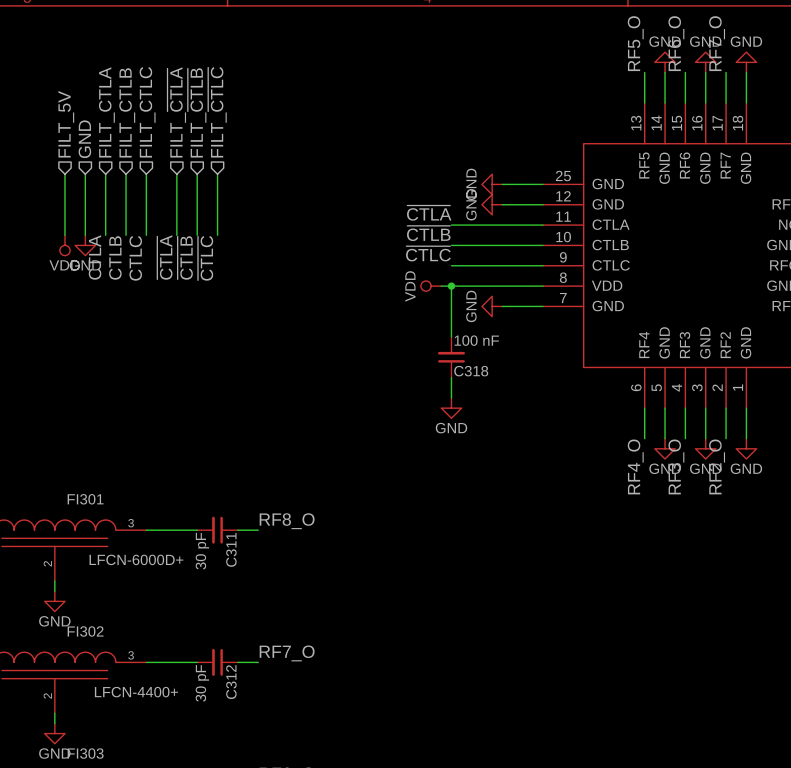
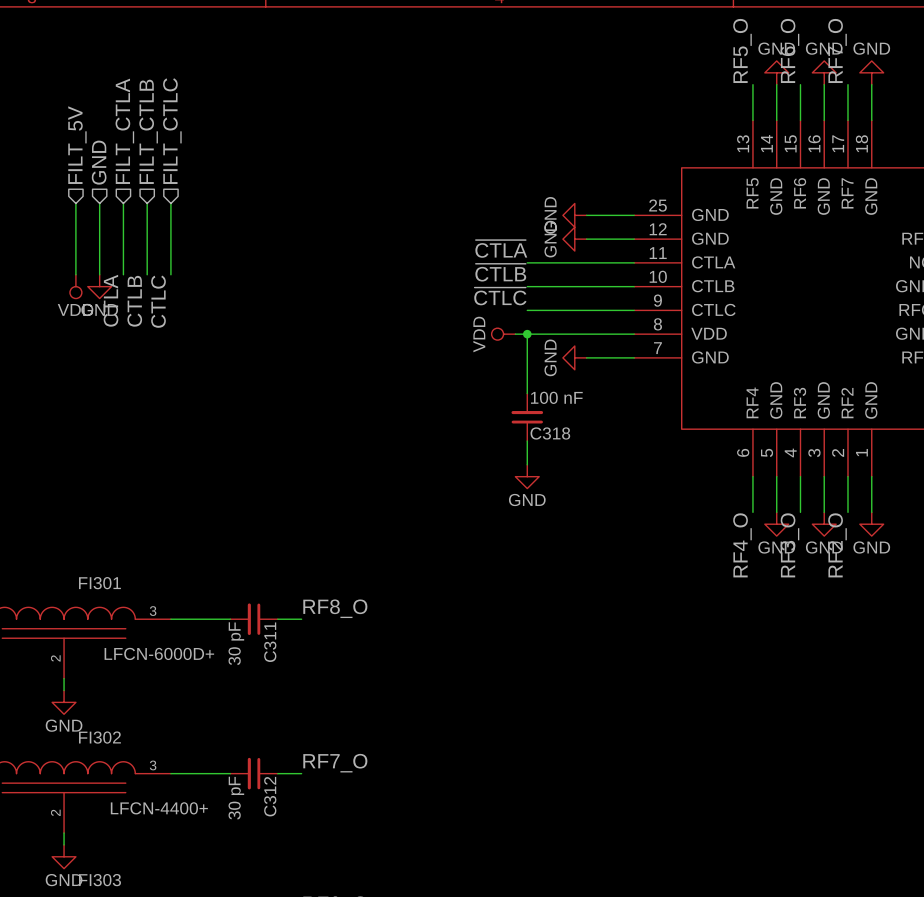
hierarchical label: FILT_~{CTLA} (176, 112) -> none
hierarchical label: FILT_~{CTLB} (197, 112) -> none
hierarchical label: FILT_~{CTLC} (217, 112) -> none
wire: (176, 174) (176, 235) -> none
wire: (197, 174) (197, 235) -> none
wire: (217, 174) (217, 235) -> none
label: ~{CTLA} (164, 257) -> none
label: ~{CTLB} (185, 257) -> none
label: ~{CTLC} (205, 258) -> none

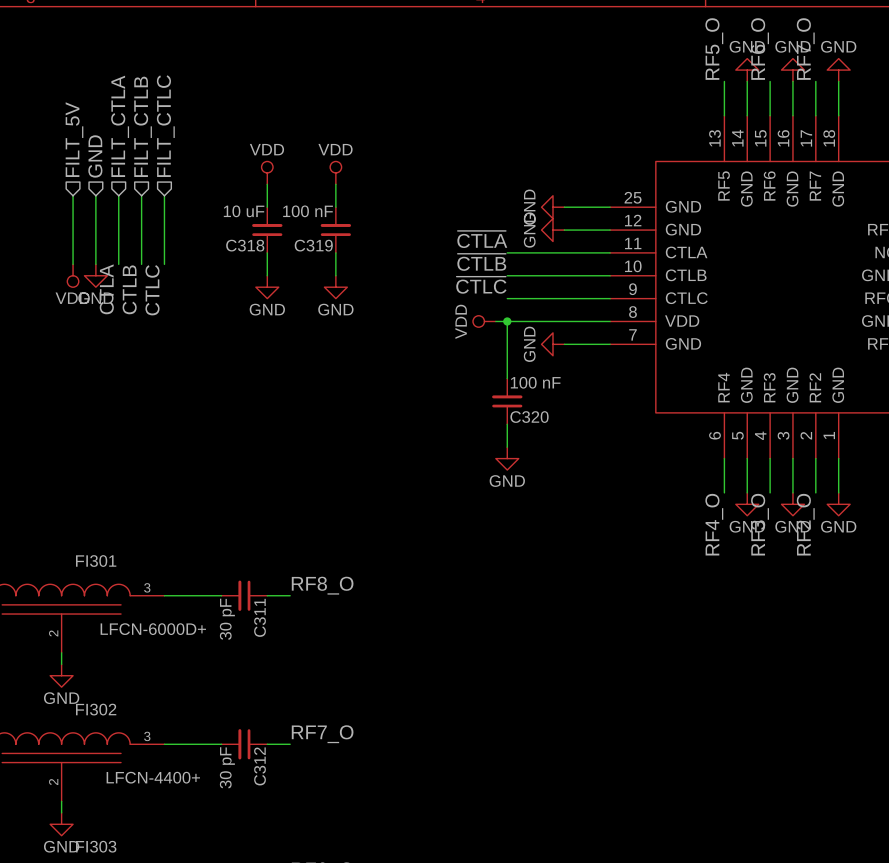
power symbol: none -> VDD (267, 172)
power symbol: none -> VDD (335, 172)
wire: none -> (267, 184) (267, 207)
wire: none -> (335, 184) (335, 207)
C318: none -> 10 uF (267, 230)
C319: none -> 100 nF (335, 230)
wire: none -> (267, 252) (267, 275)
wire: none -> (335, 252) (335, 275)
power symbol: none -> GND (267, 287)
power symbol: none -> GND (335, 287)
C318 name: C318 (550, 433) -> C320 (529, 417)

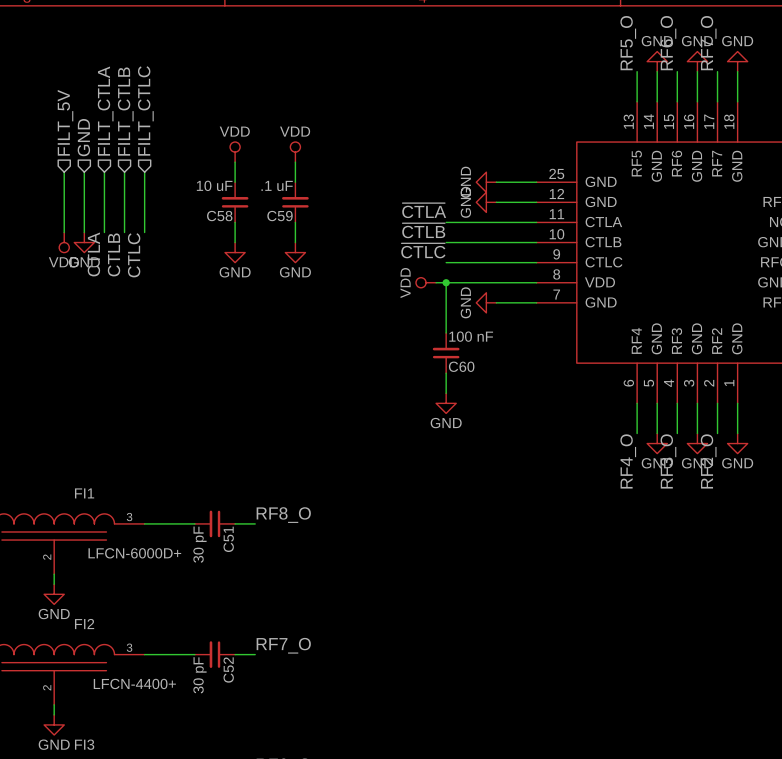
C319 value: 100 nF (308, 211) -> .1 uF (277, 185)
C318 name: C318 (245, 245) -> C58 (219, 216)
C319 name: C319 (313, 245) -> C59 (280, 216)
C320 name: C320 (529, 417) -> C60 (461, 366)
FI301 name: FI301 (96, 561) -> FI1 (84, 493)
C311 name: C311 (260, 617) -> C51 (228, 539)
FI302 name: FI302 (96, 709) -> FI2 (84, 624)
C312 name: C312 (260, 766) -> C52 (228, 670)
FI303 name: FI303 (96, 846) -> FI3 (84, 744)

